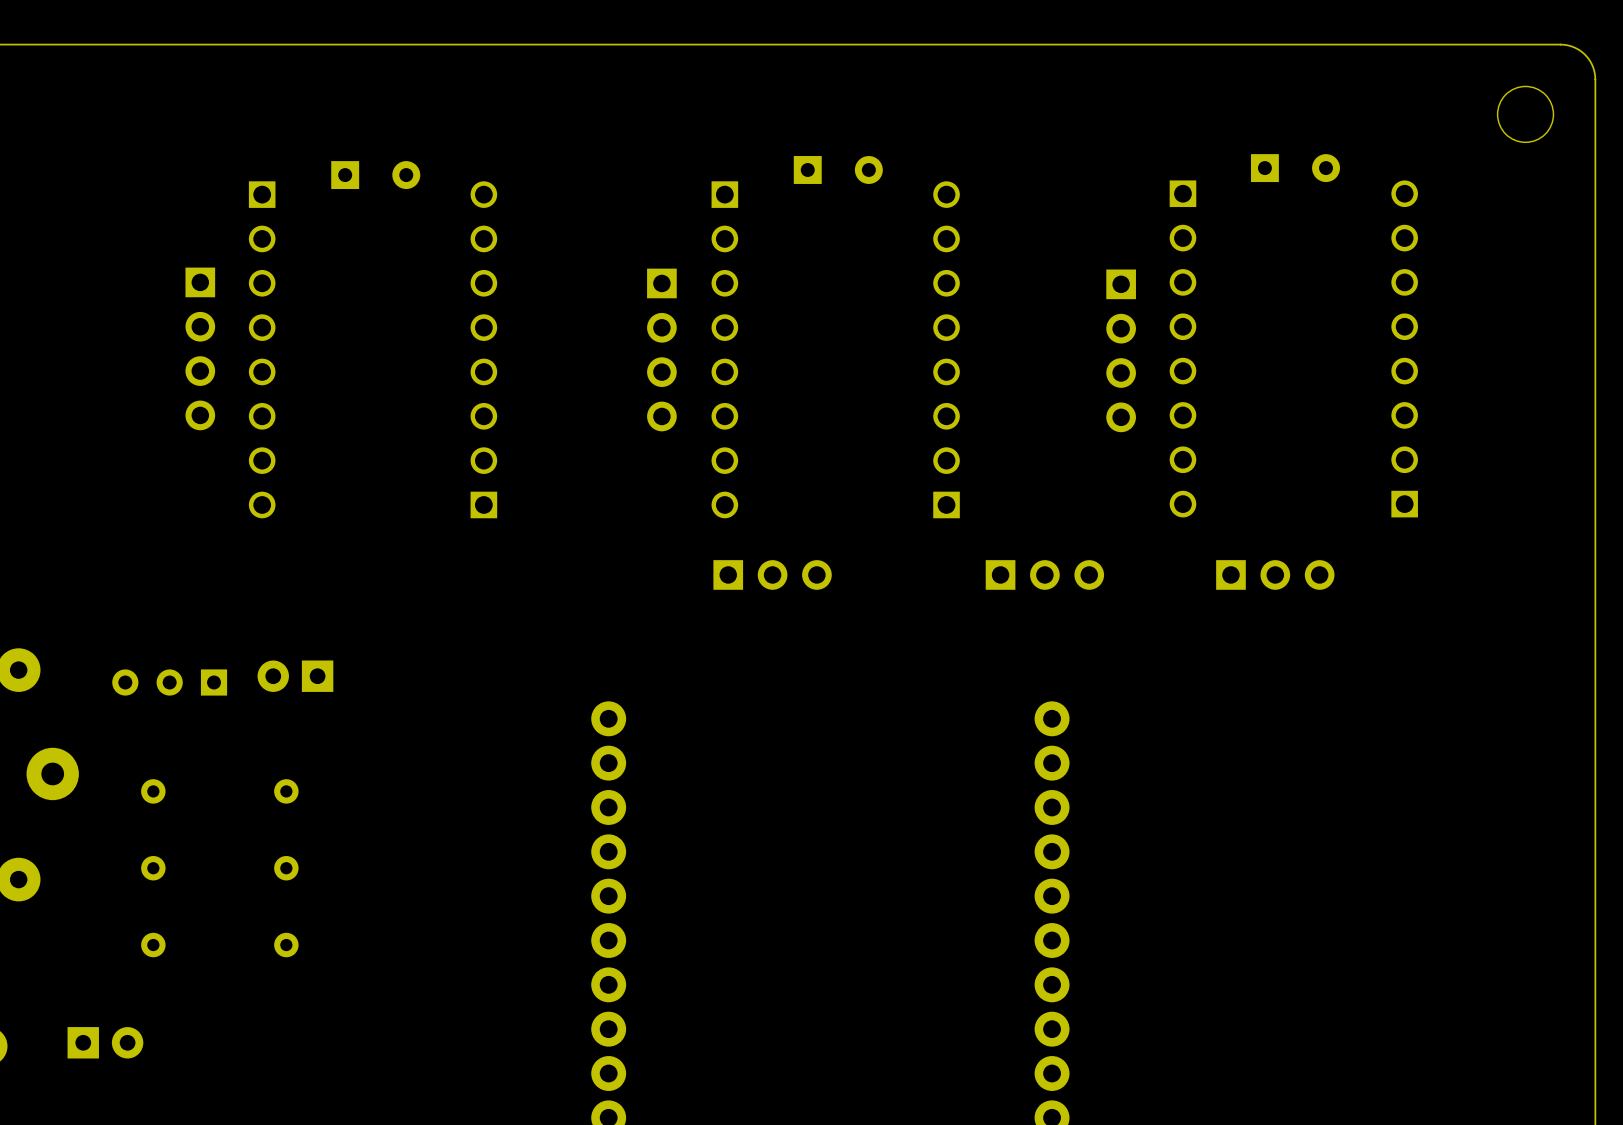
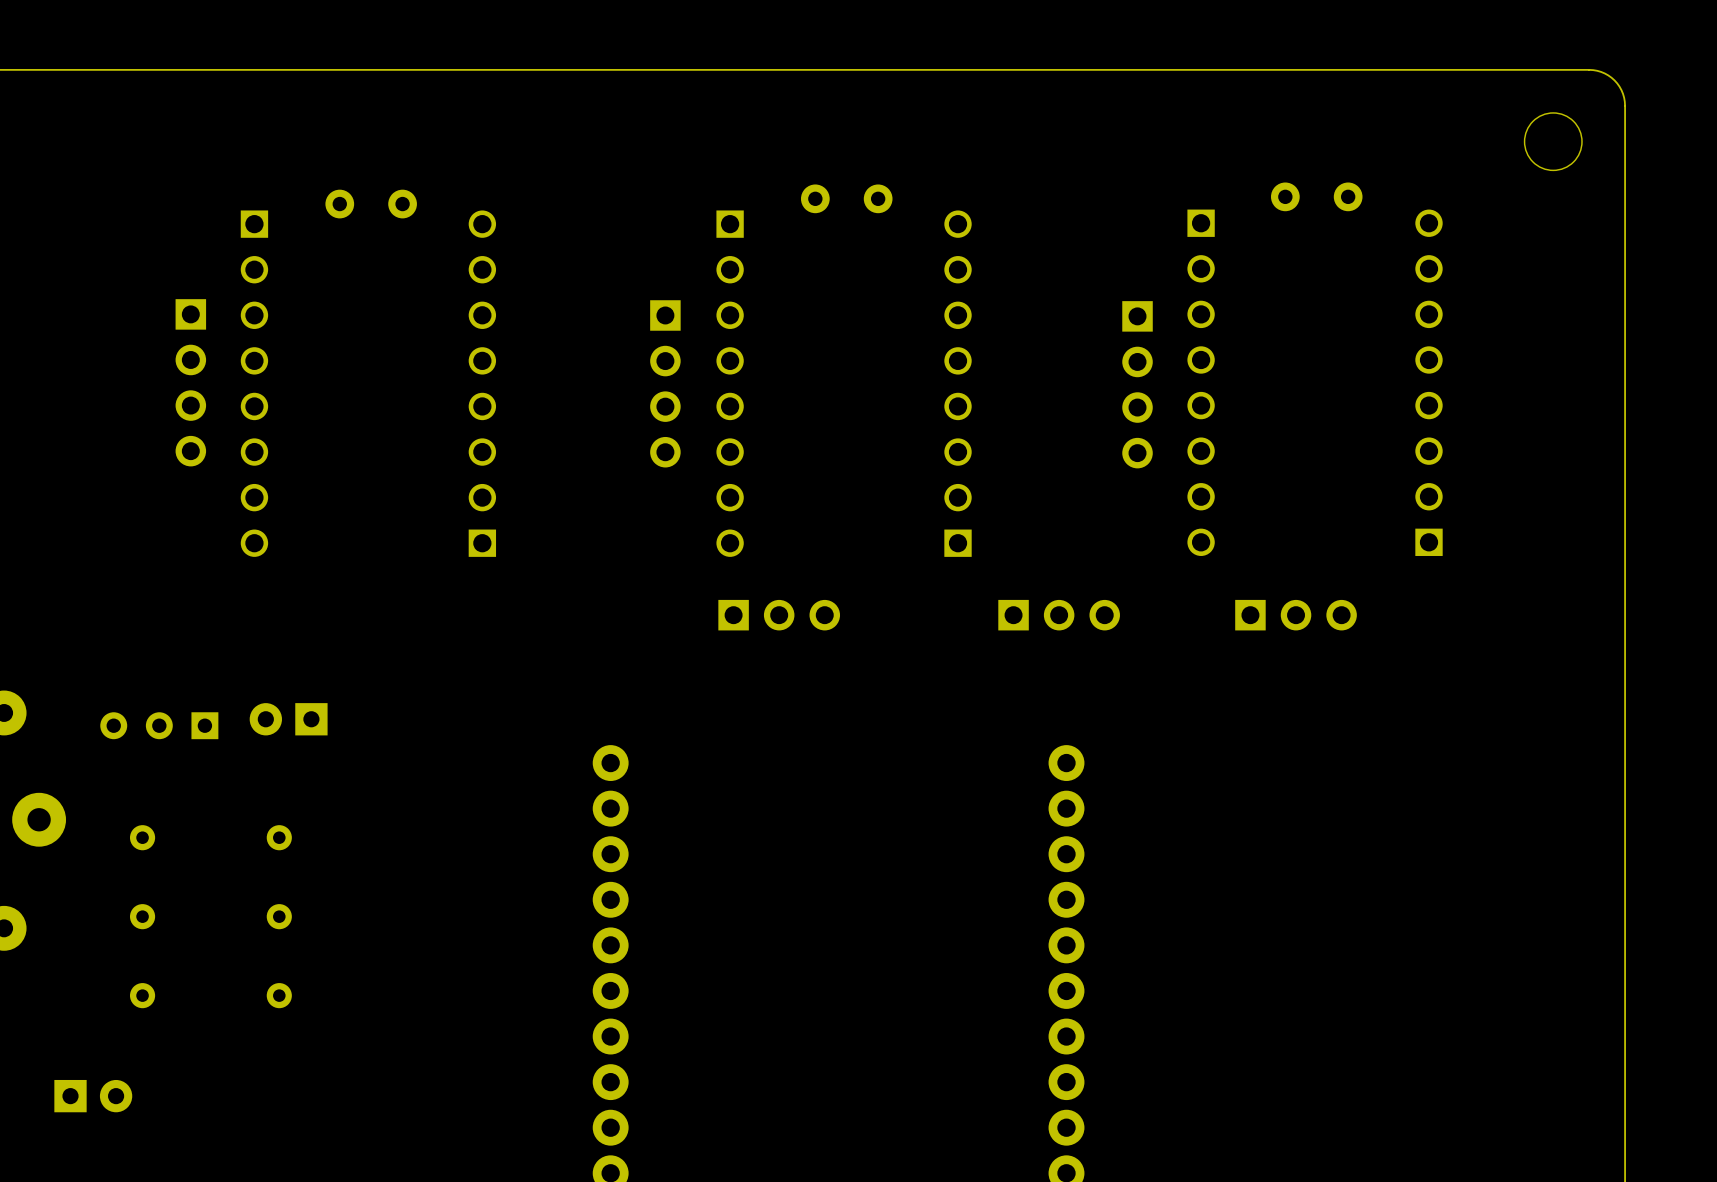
part footprint: [1250, 154, 1340, 183] -> [1270, 182, 1363, 212]
part footprint: [793, 156, 883, 184] -> [800, 184, 893, 214]
part footprint: [331, 161, 421, 190] -> [325, 189, 417, 219]

